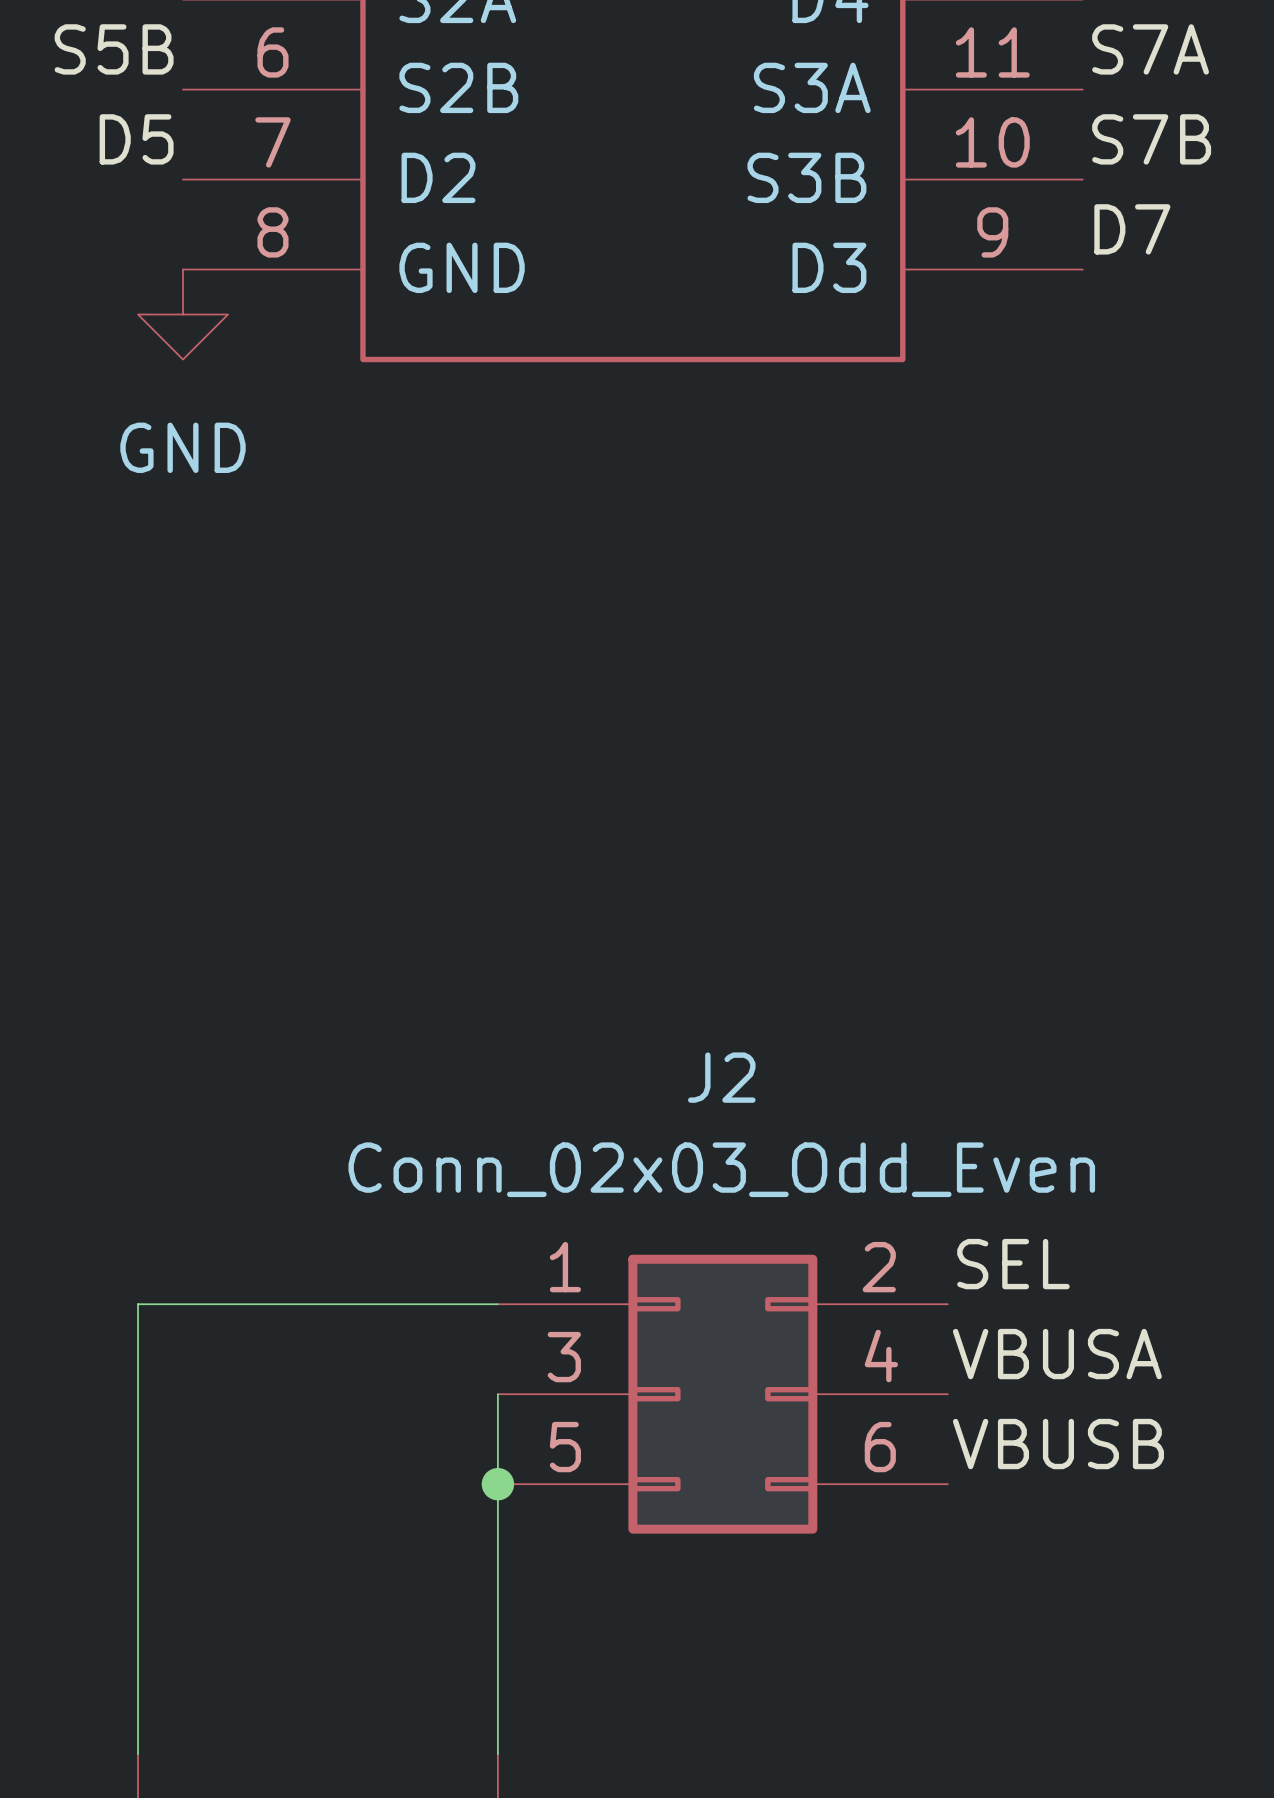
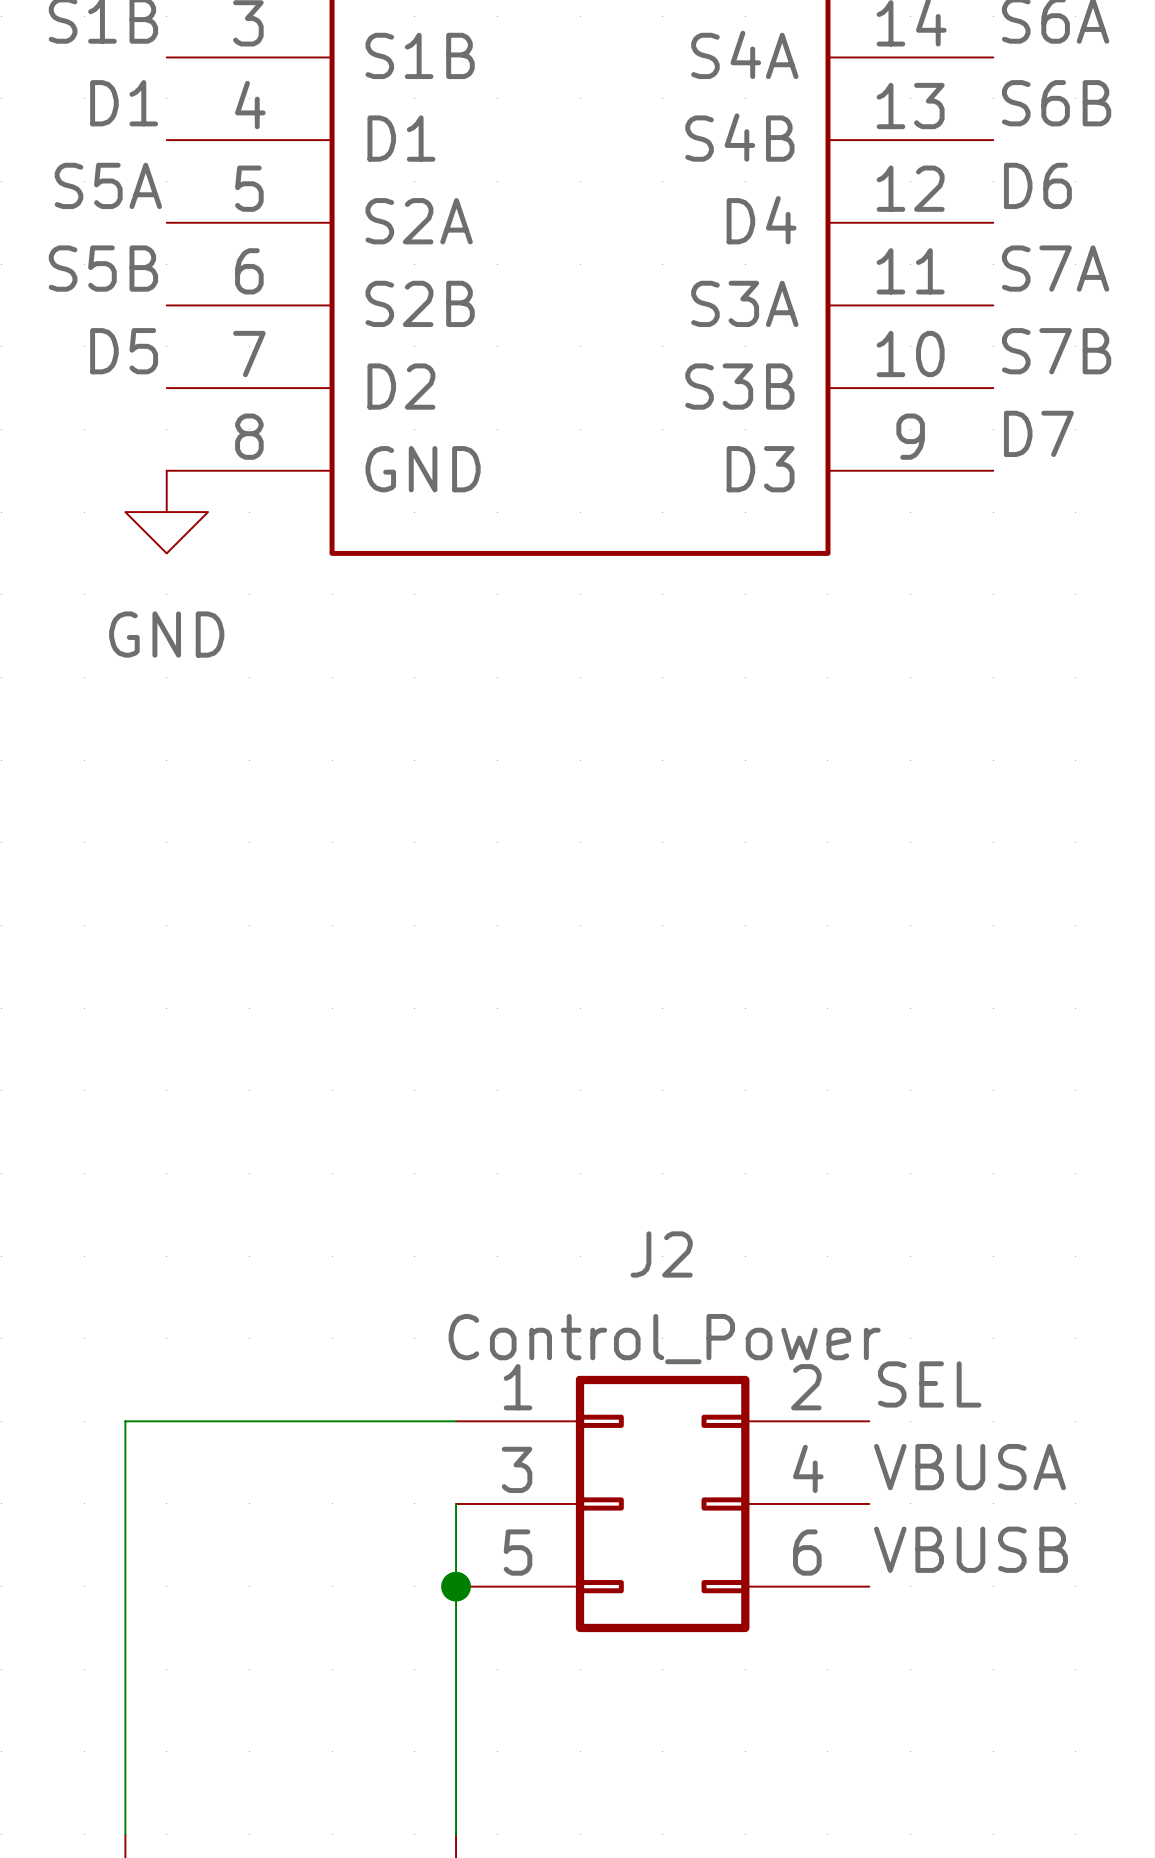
J2 name position: J2 (721, 1077) -> J2 (661, 1254)
J2 value: Conn_02x03_Odd_Even (721, 1169) -> Control_Power (664, 1339)

